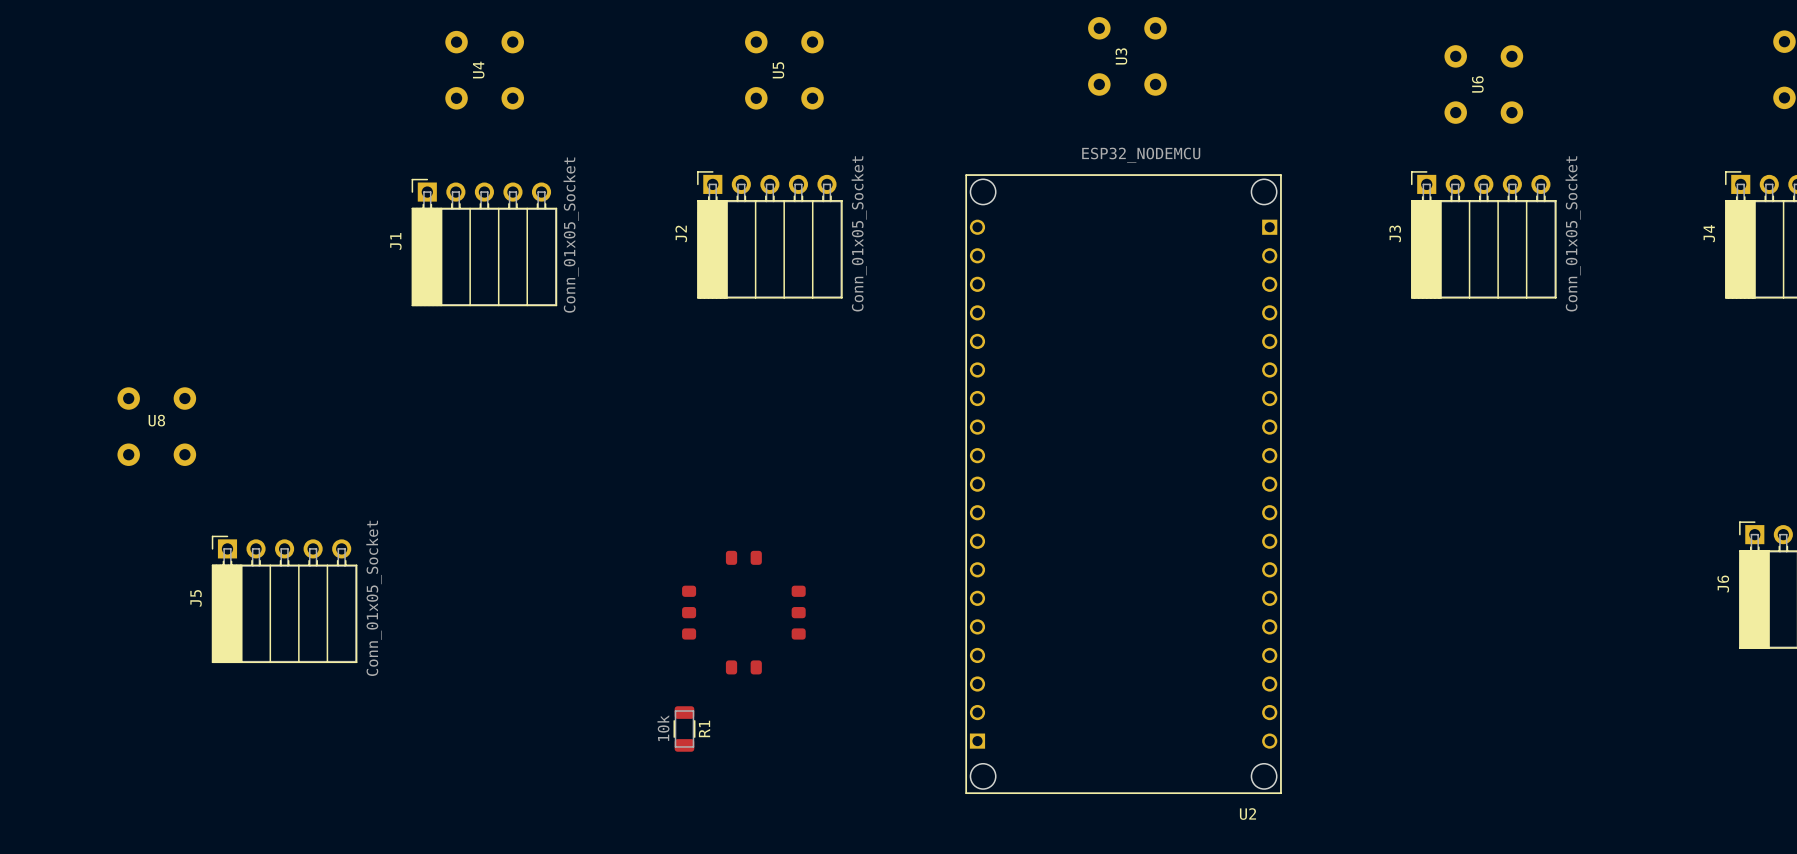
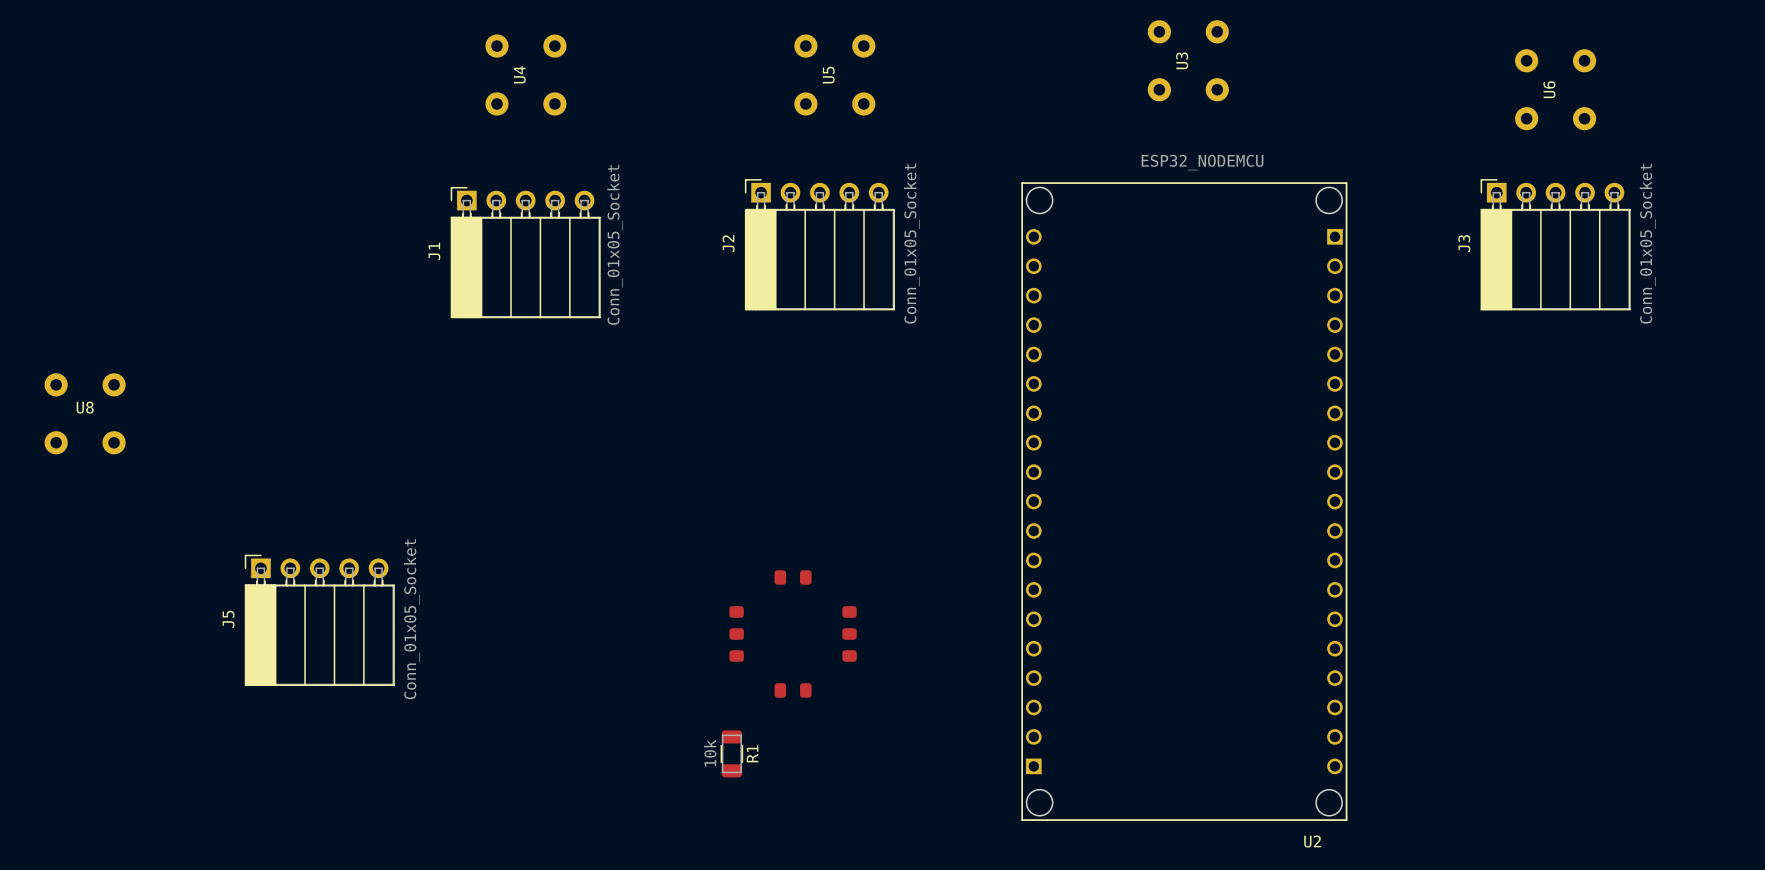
U8 position: (156, 426) -> (85, 413)

